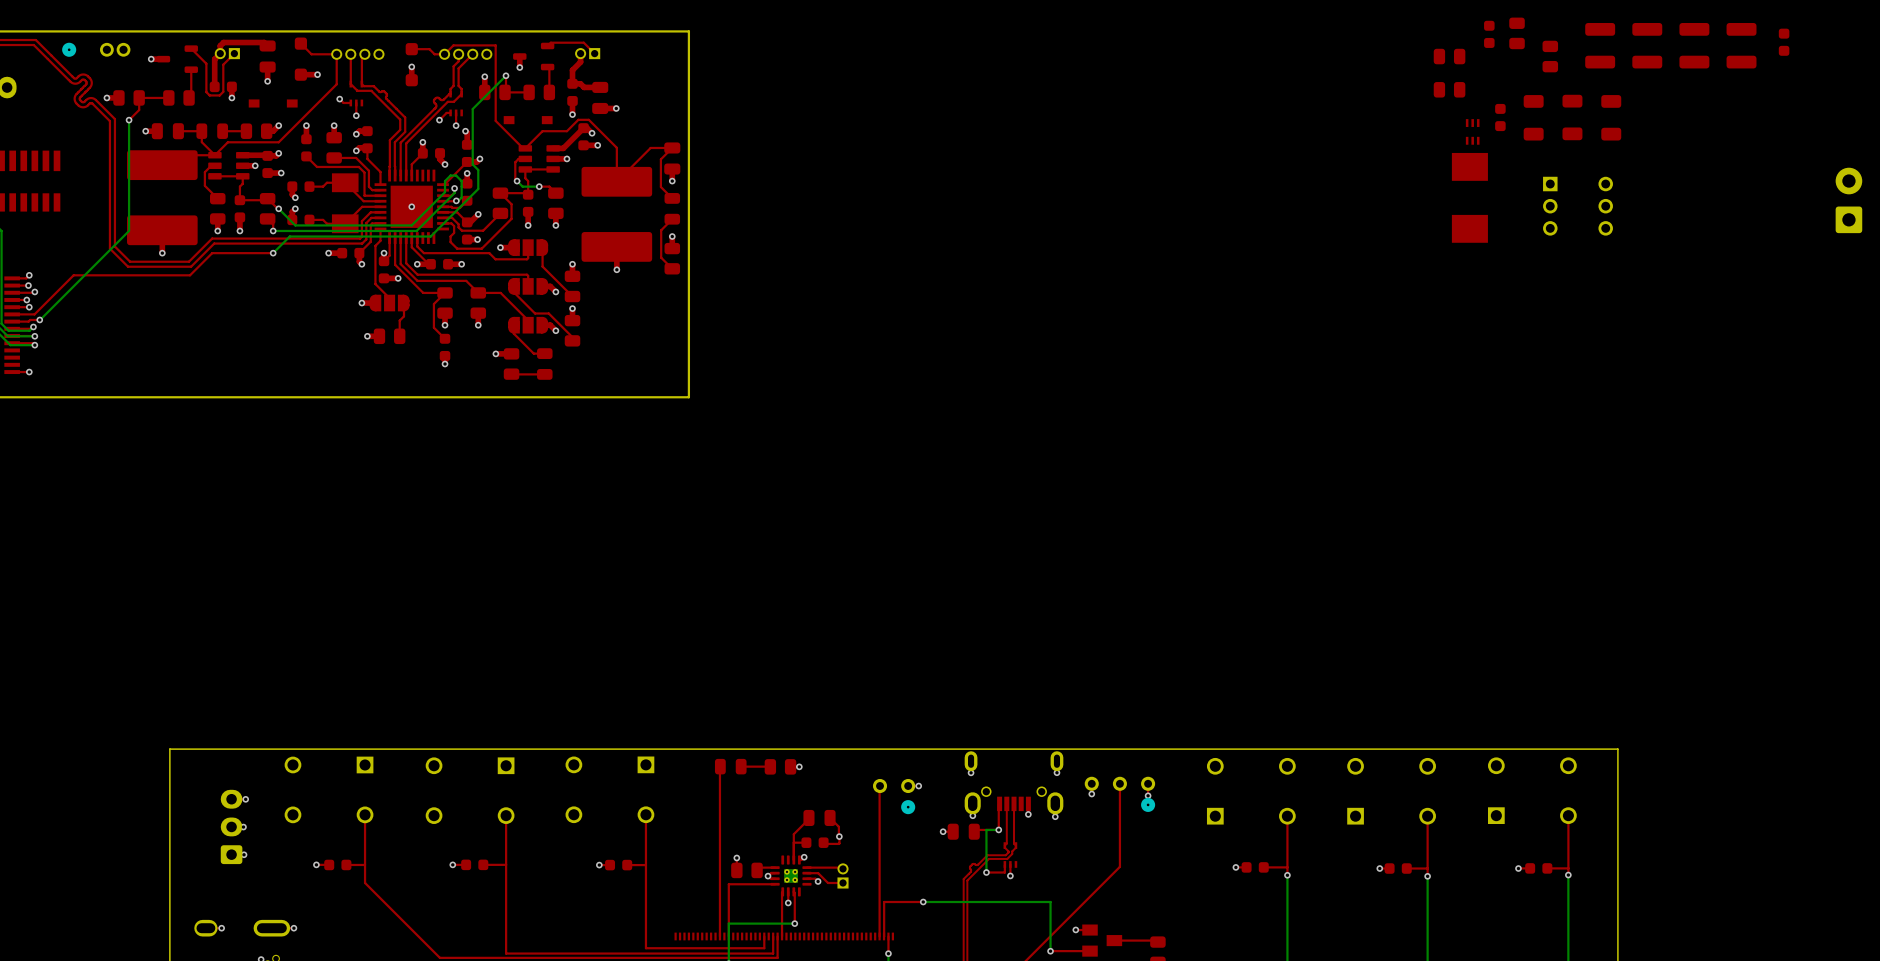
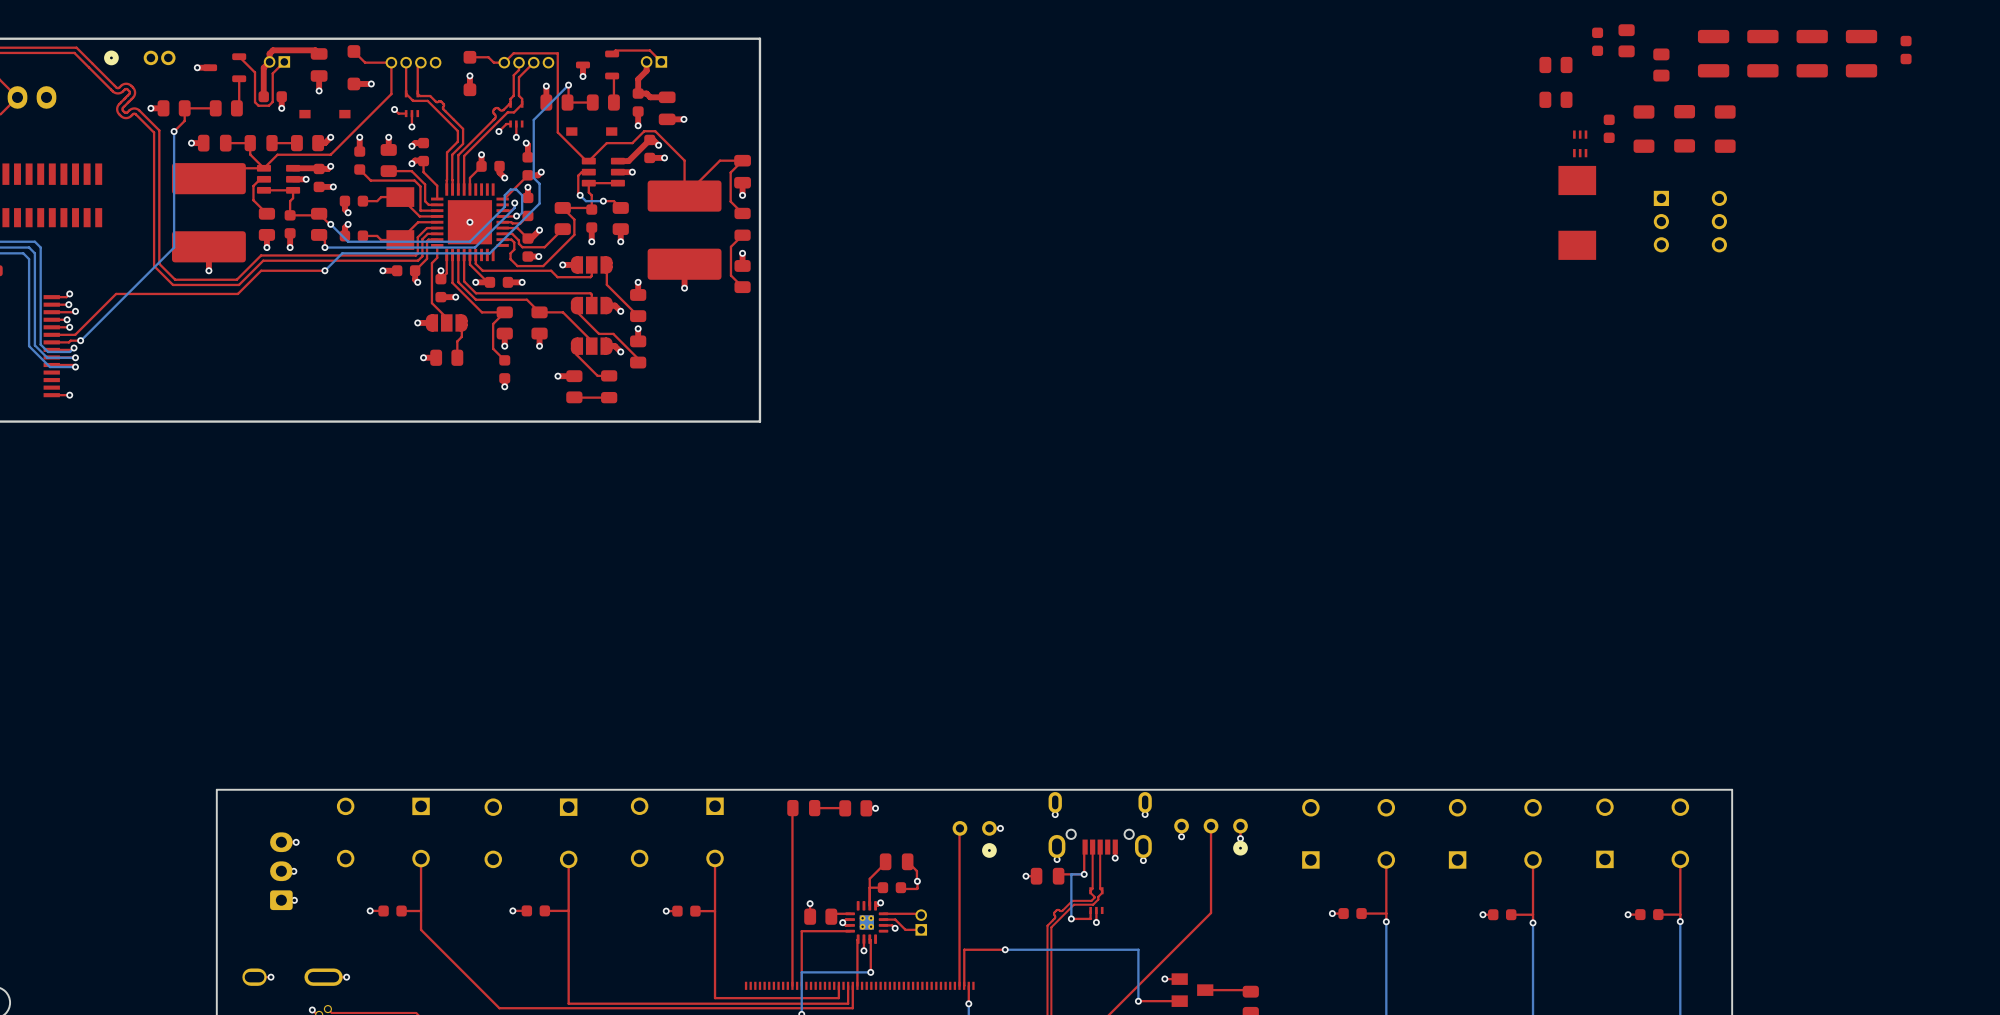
part: (1848, 200) -> none

